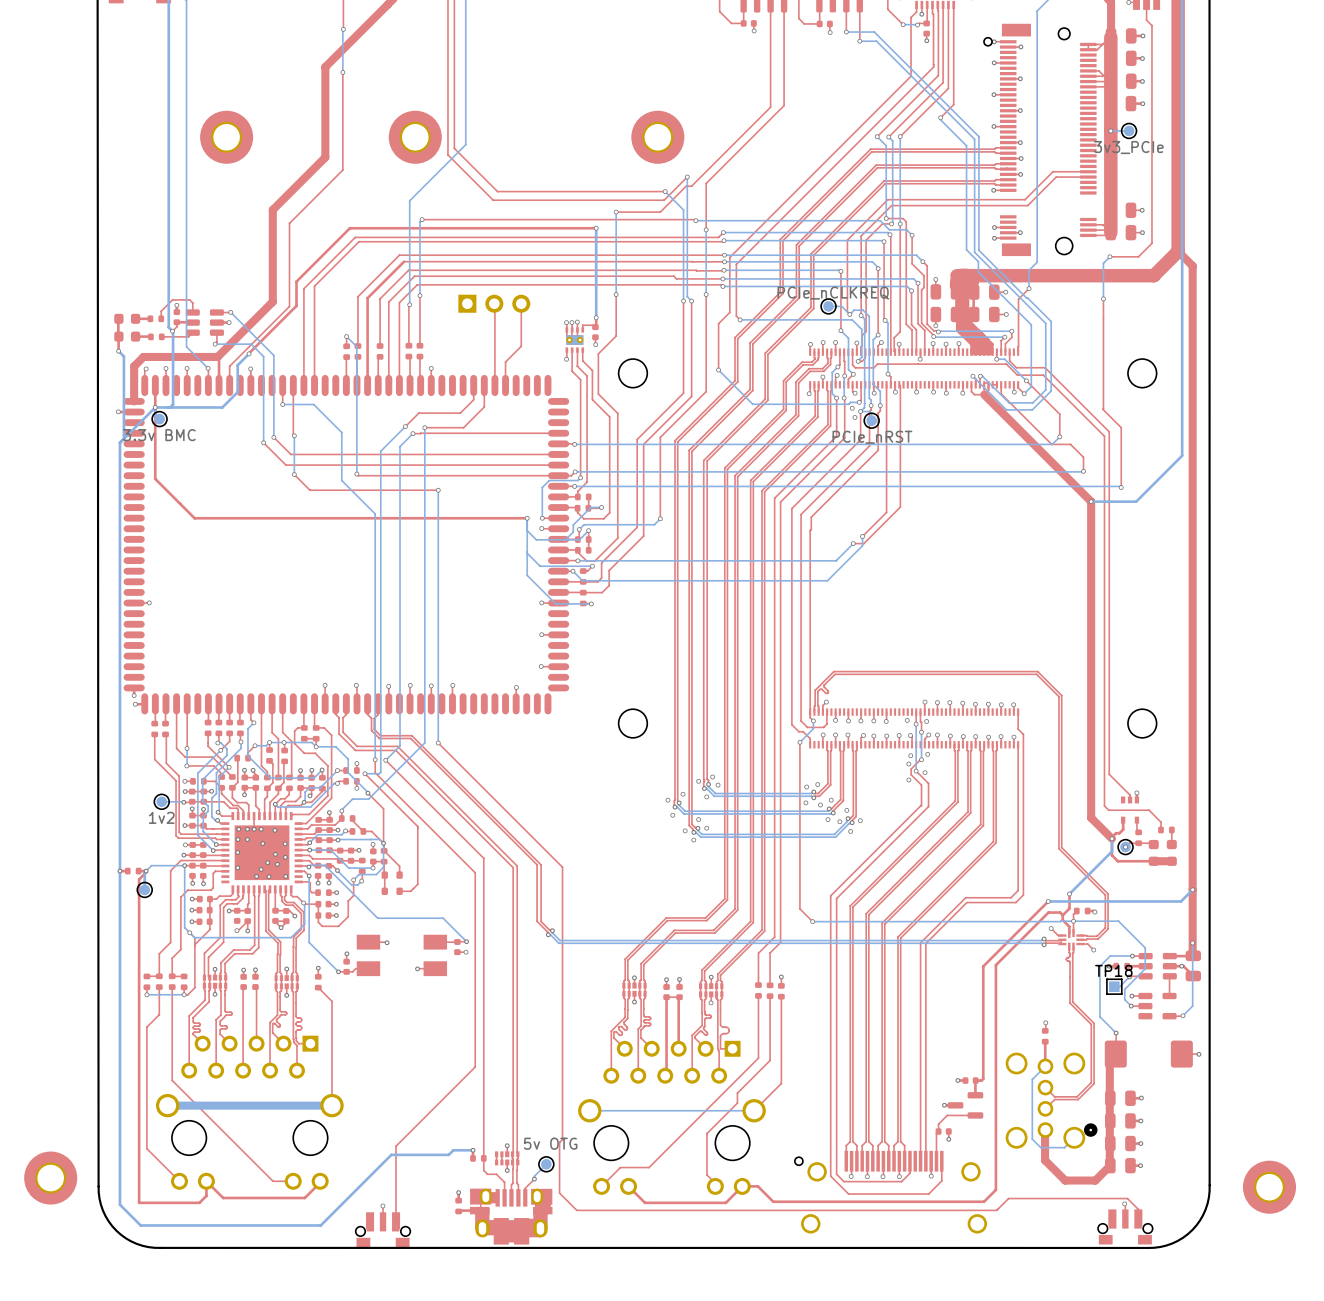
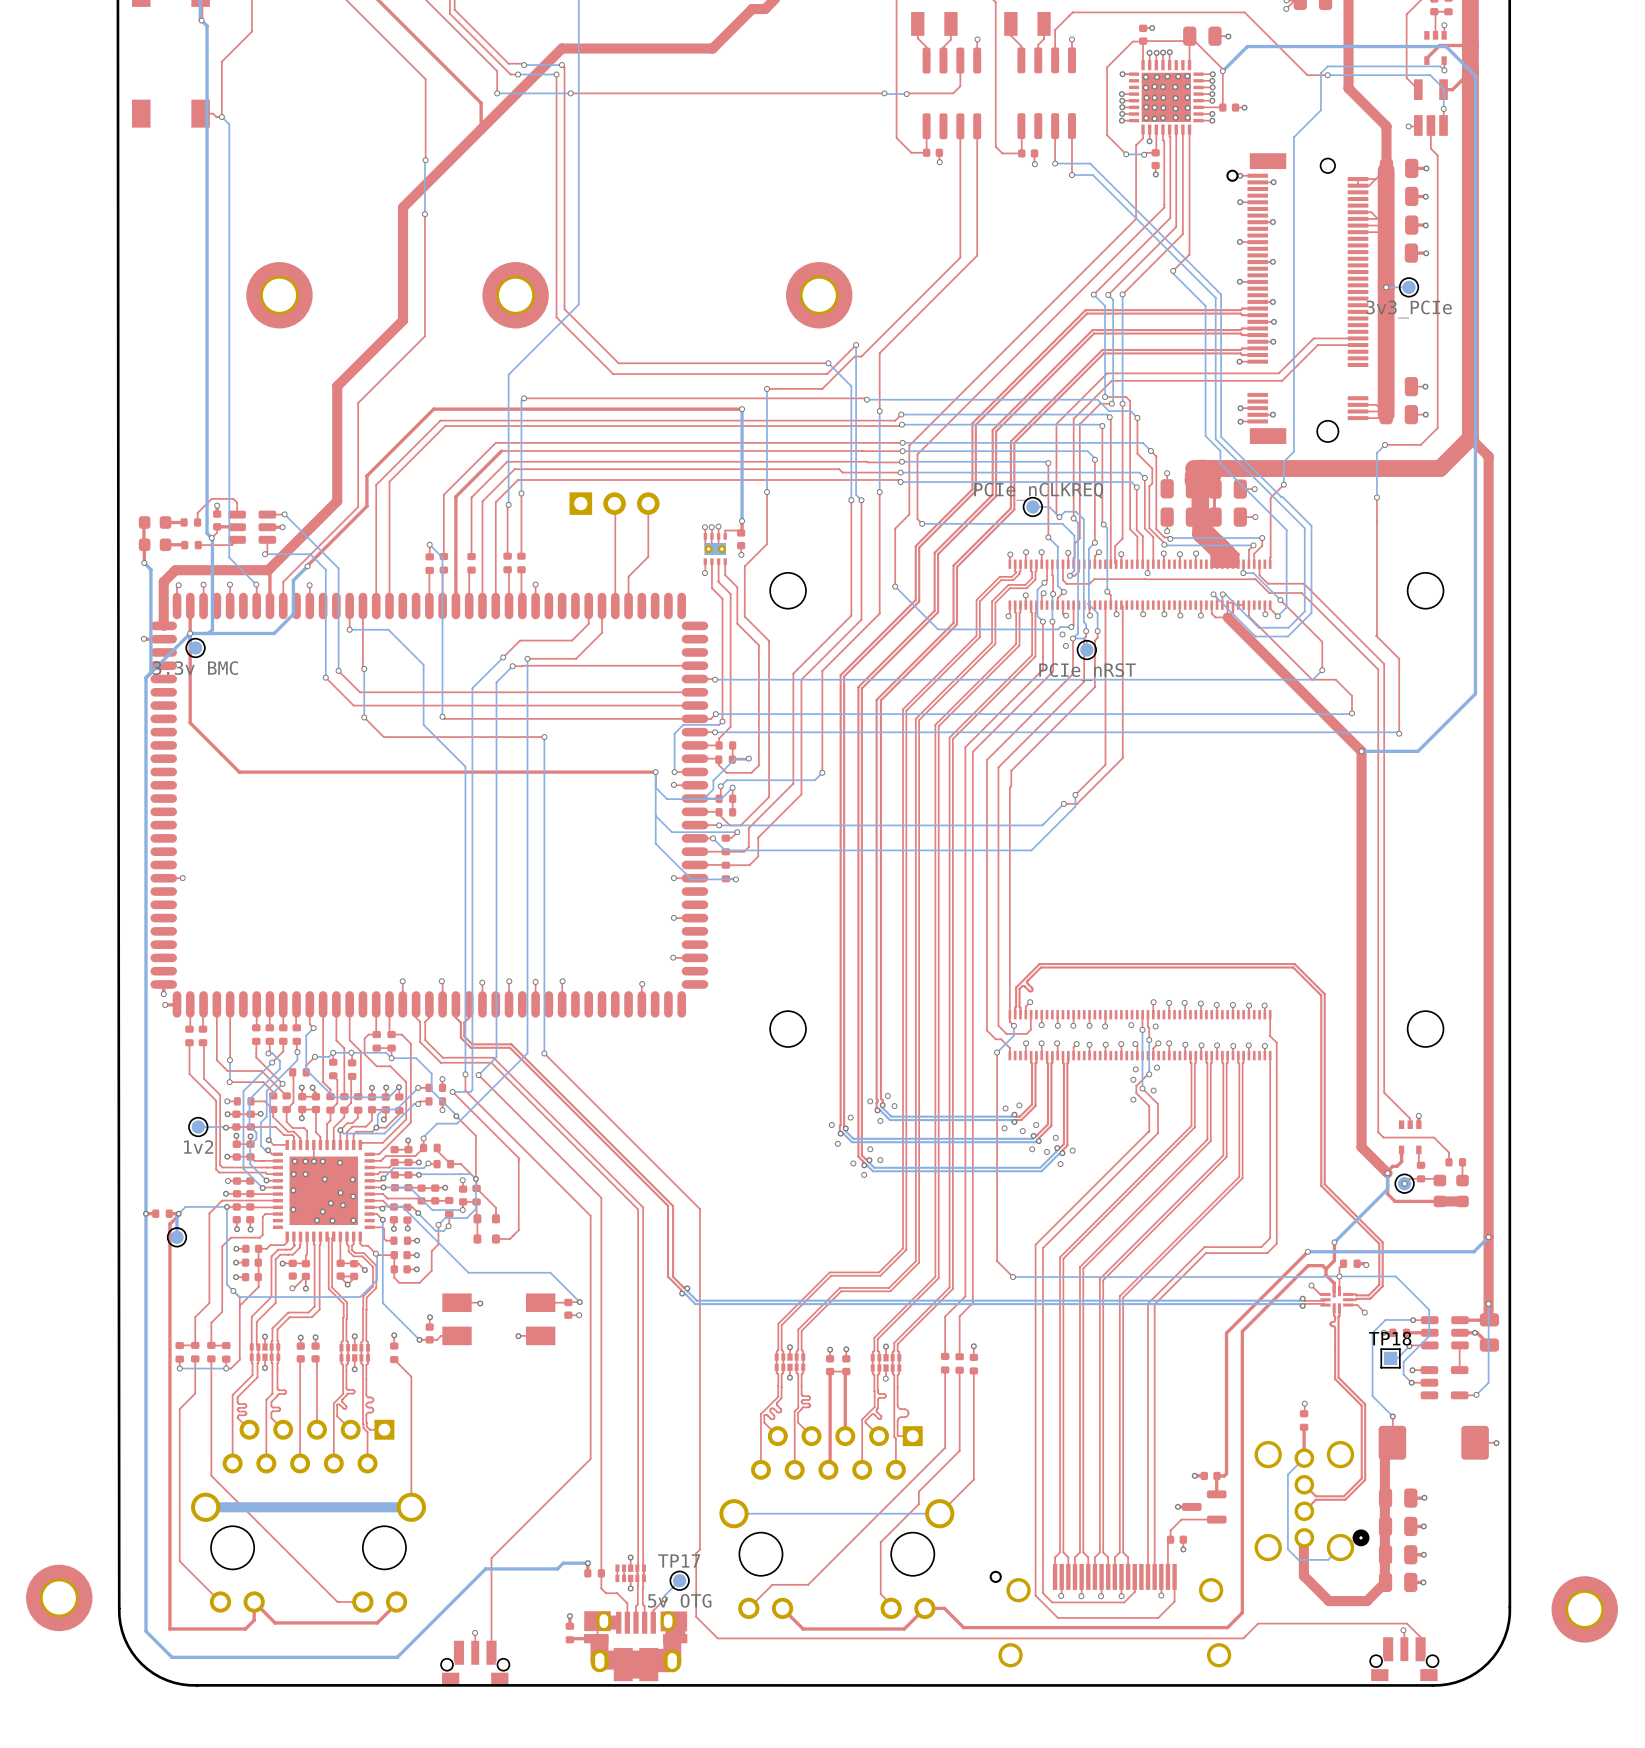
TP17 value position: 5v OTG (550, 1143) -> 5v OTG (679, 1600)
TP17 name: none -> TP17 (679, 1560)

